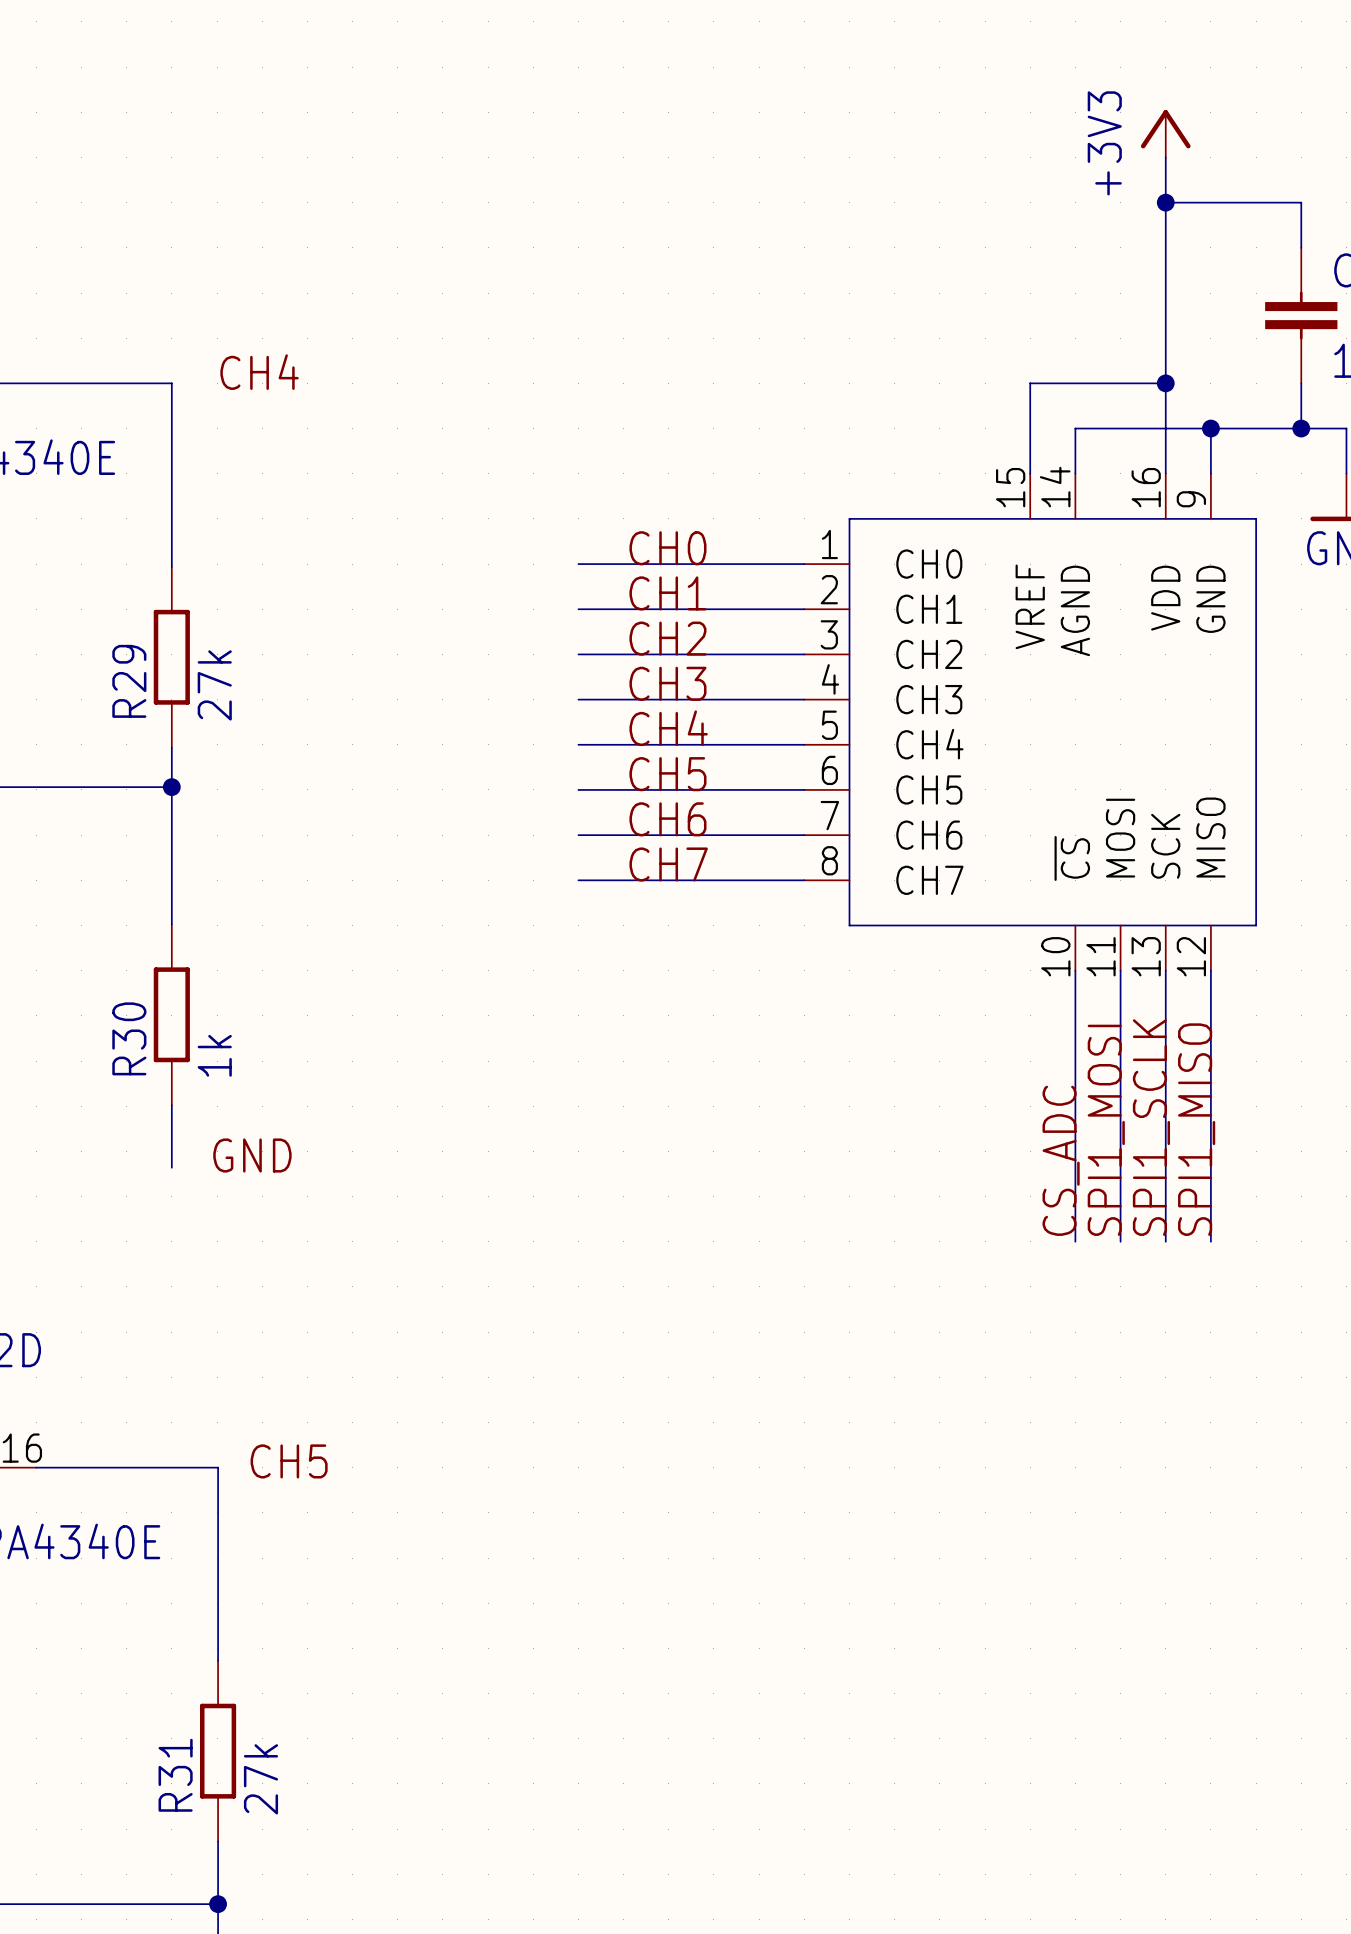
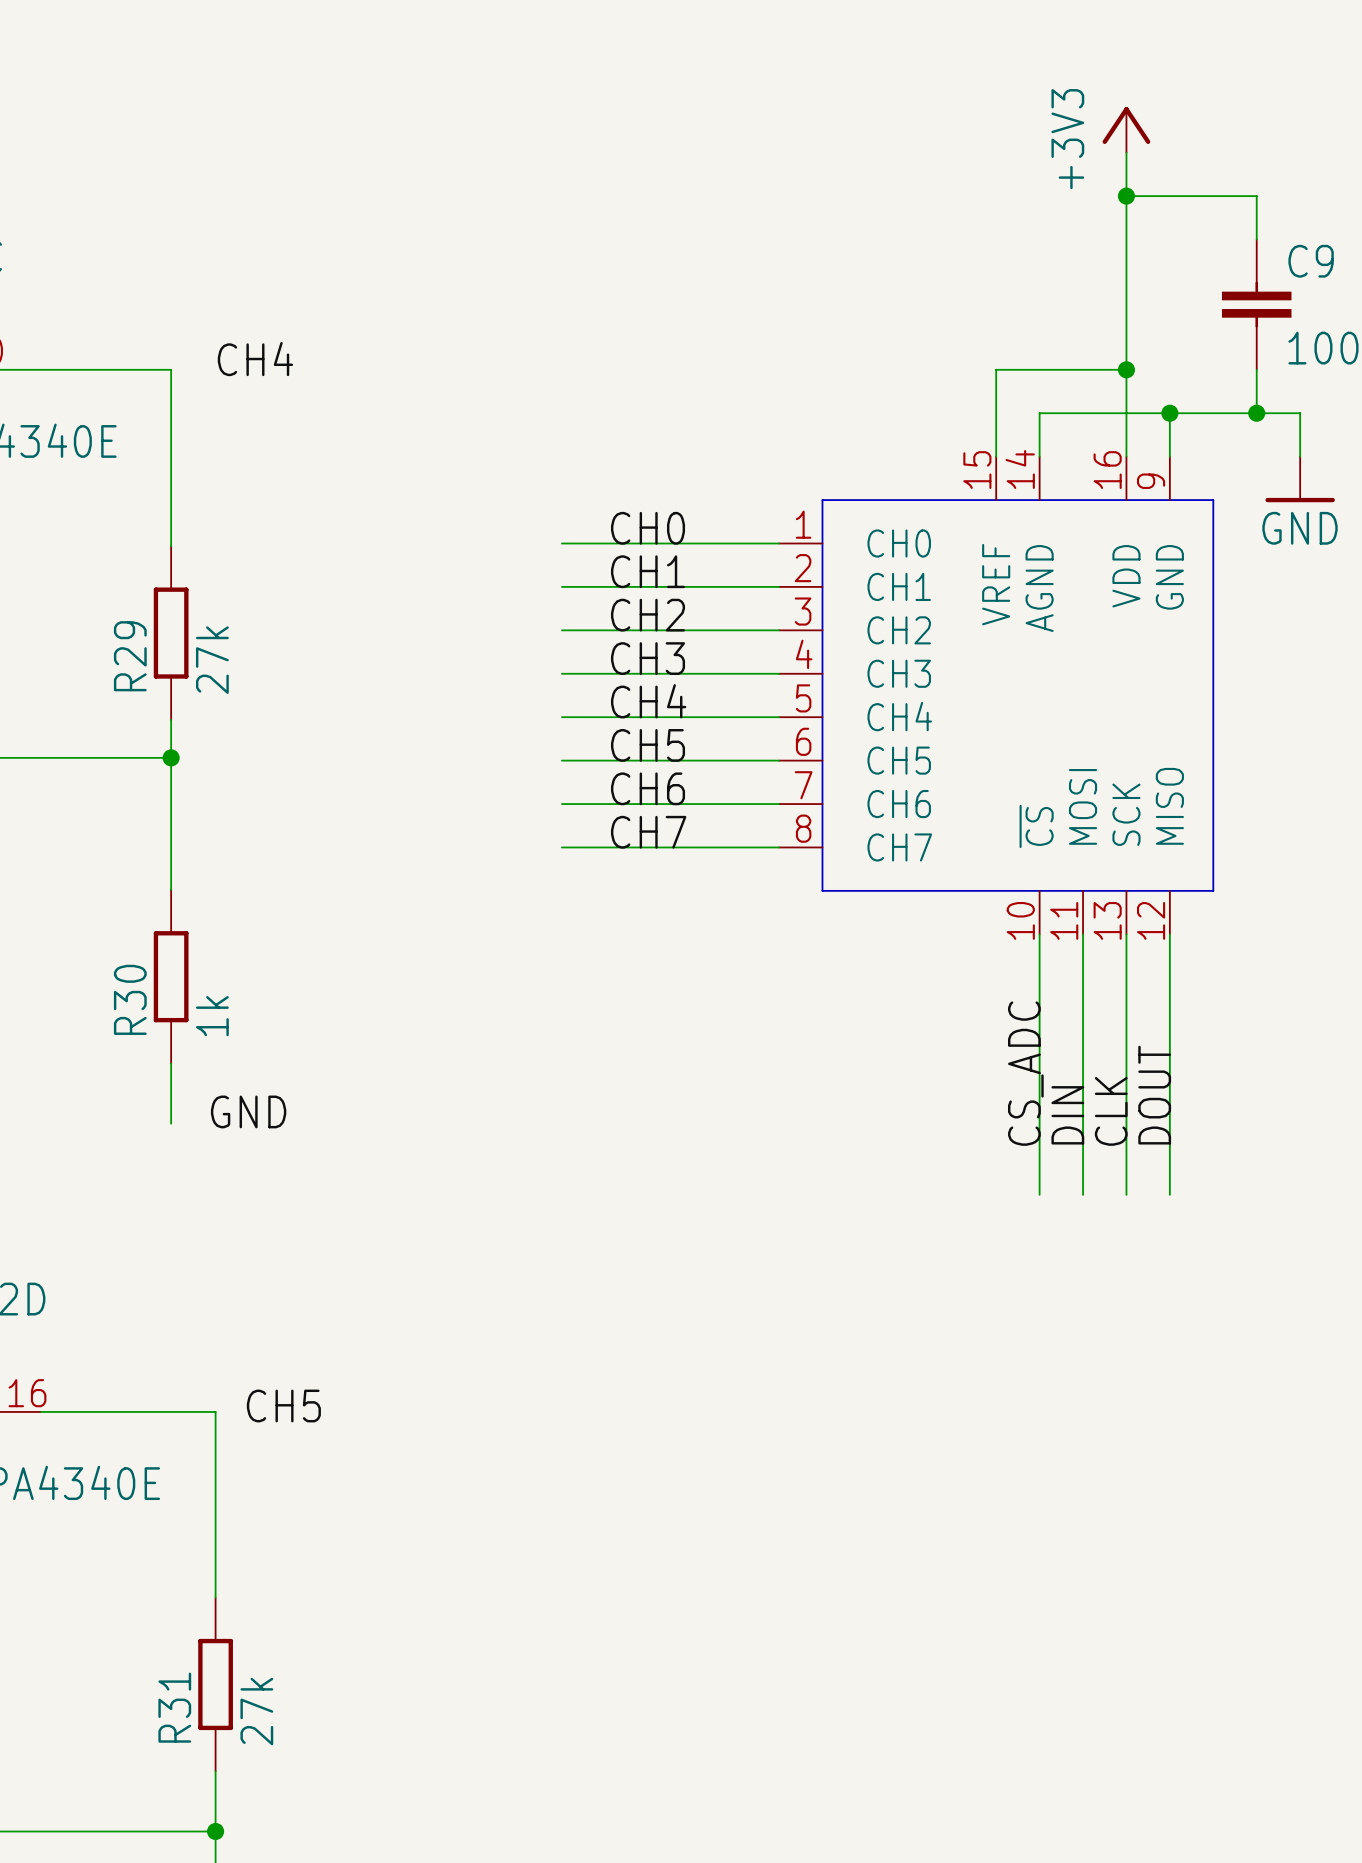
label: SPI1_SCLK (1151, 1127) -> none
label: SPI1_MISO (1196, 1129) -> none
label: SPI1_MOSI (1106, 1130) -> none
label: none -> DOUT (1154, 1095)
label: none -> CLK (1111, 1111)
label: none -> DIN (1067, 1115)
label position: CS_ADC (1061, 1160) -> CS_ADC (1025, 1073)

